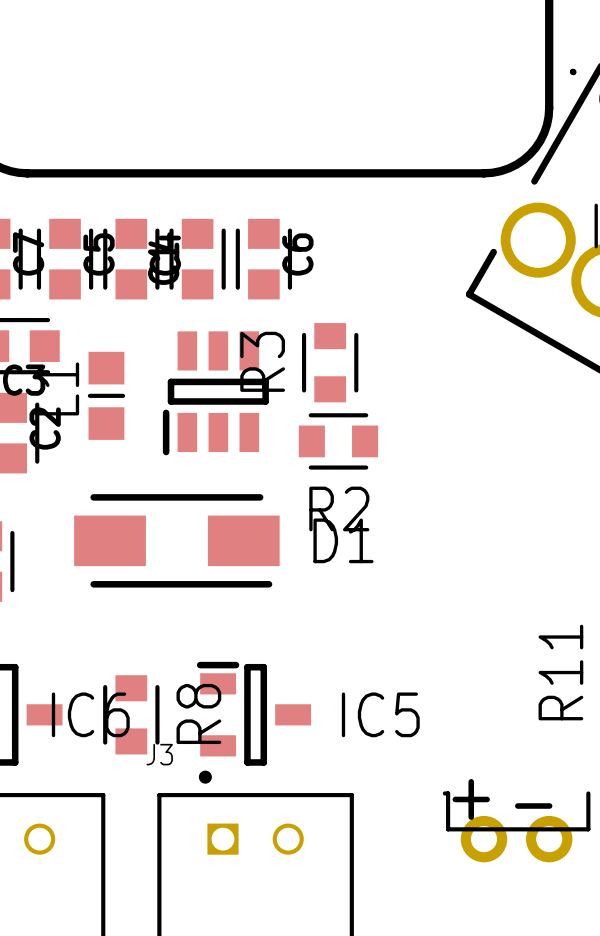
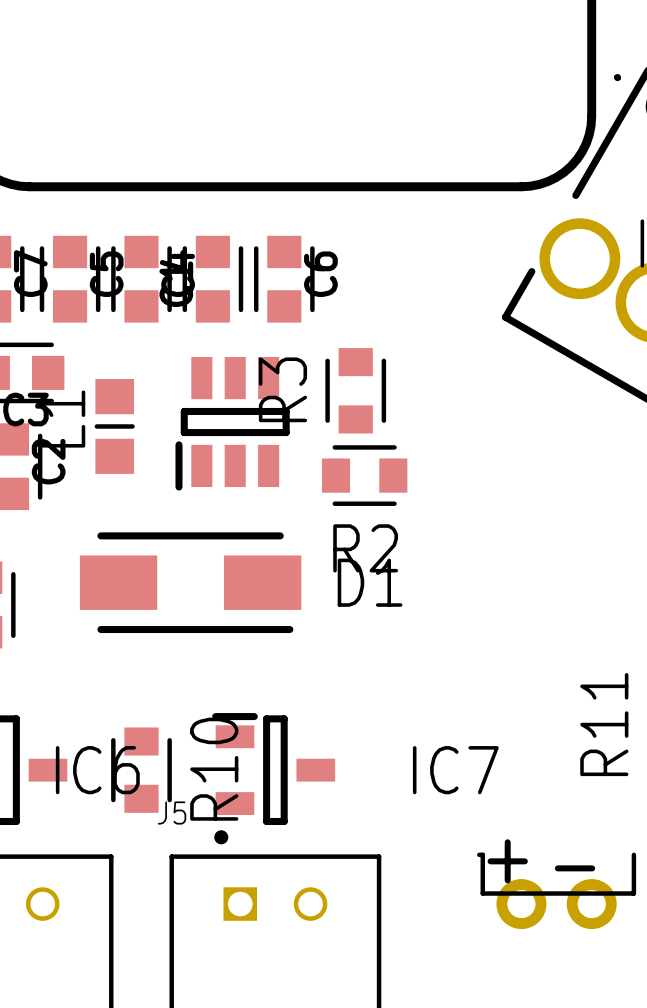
R8 name: R8 (198, 713) -> R10 (214, 769)
IC5 name: IC5 (380, 714) -> IC7 (455, 770)
J3 name: J3 (159, 754) -> J5 (172, 813)

